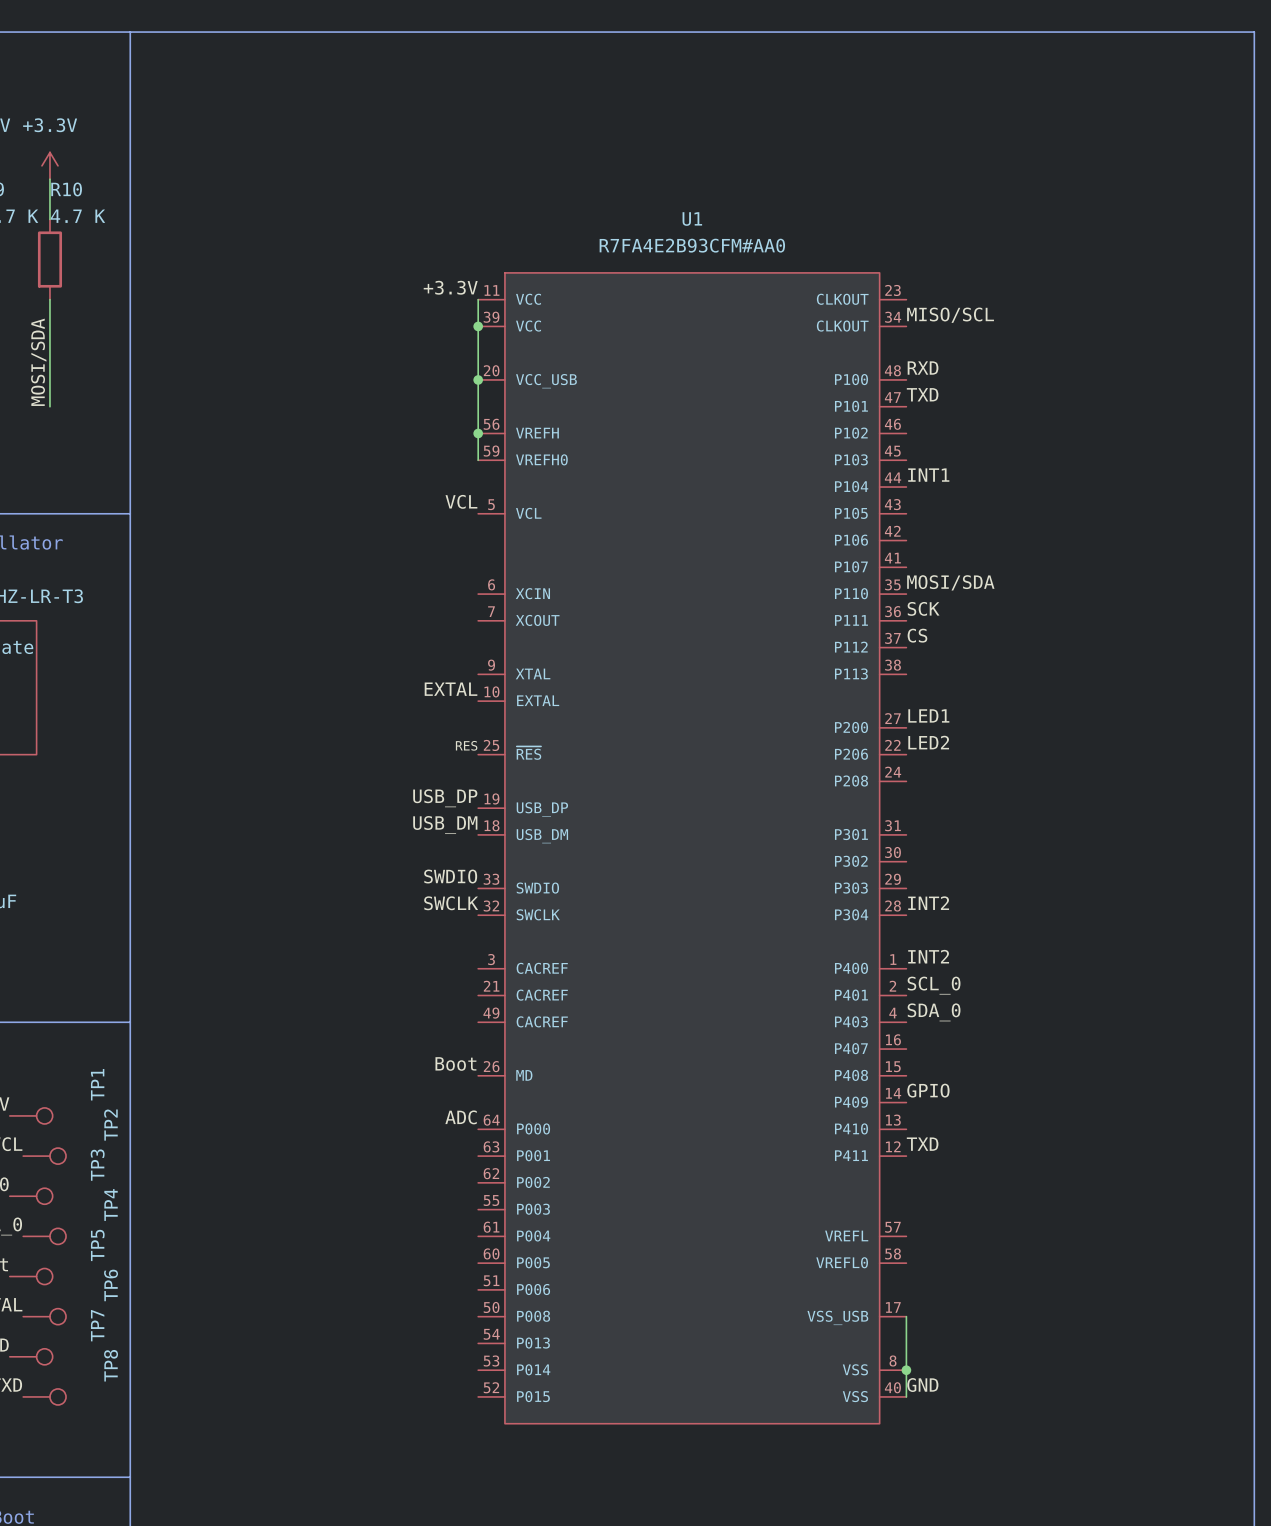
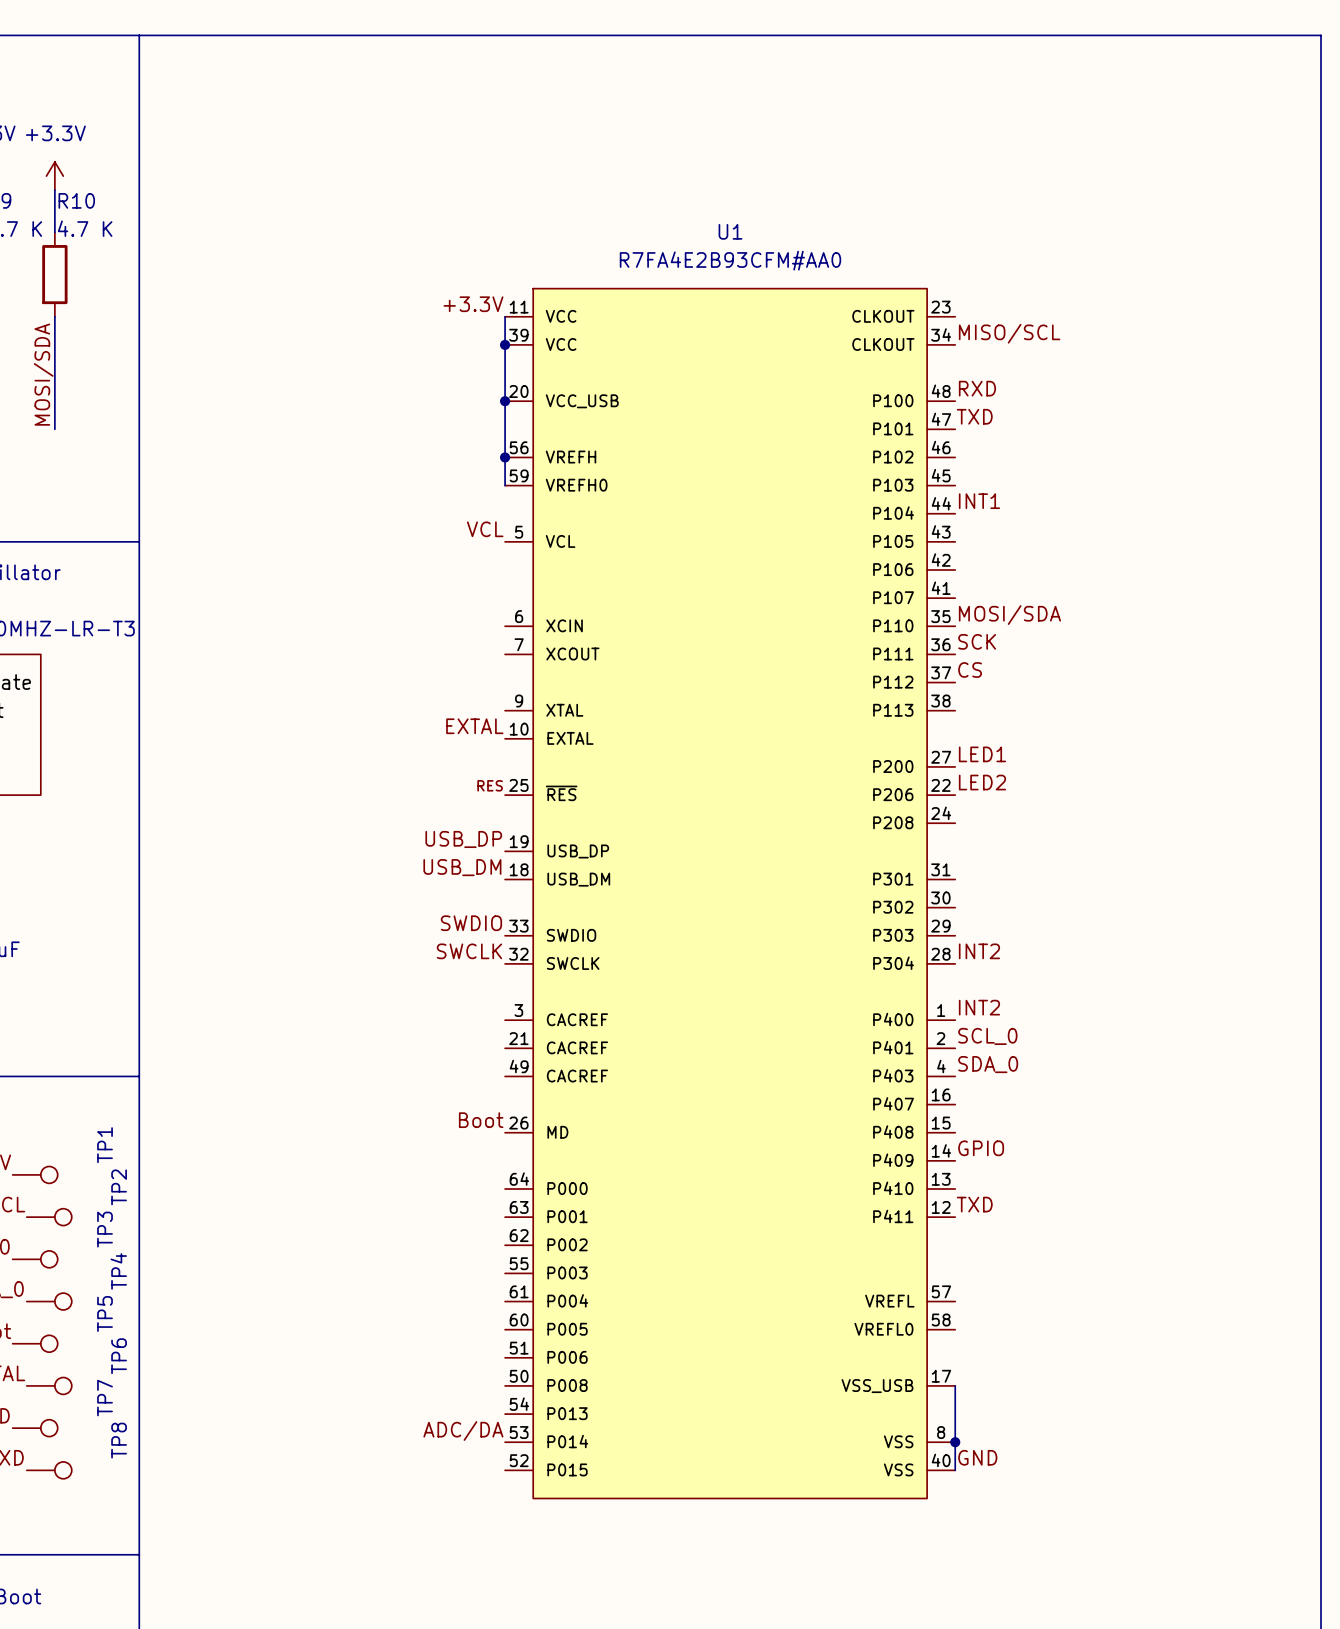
label: ADC (461, 1117) -> none
label: none -> ADC/DA (463, 1431)

